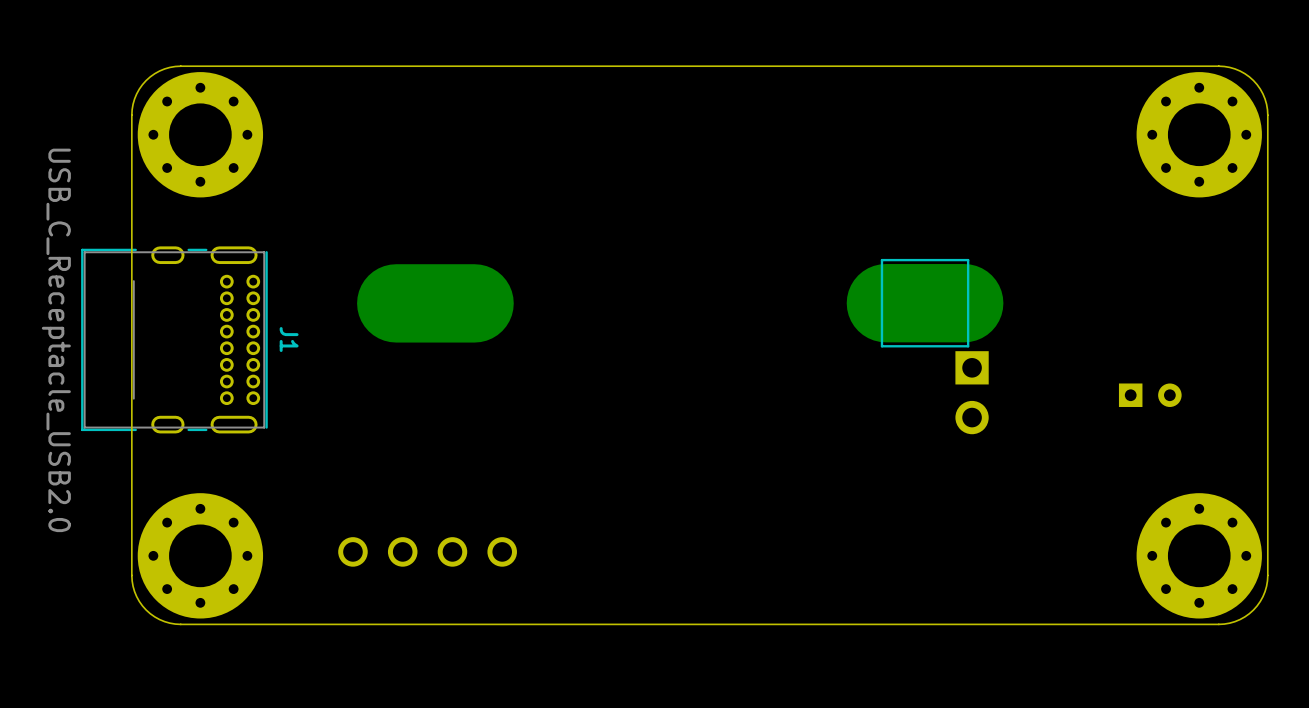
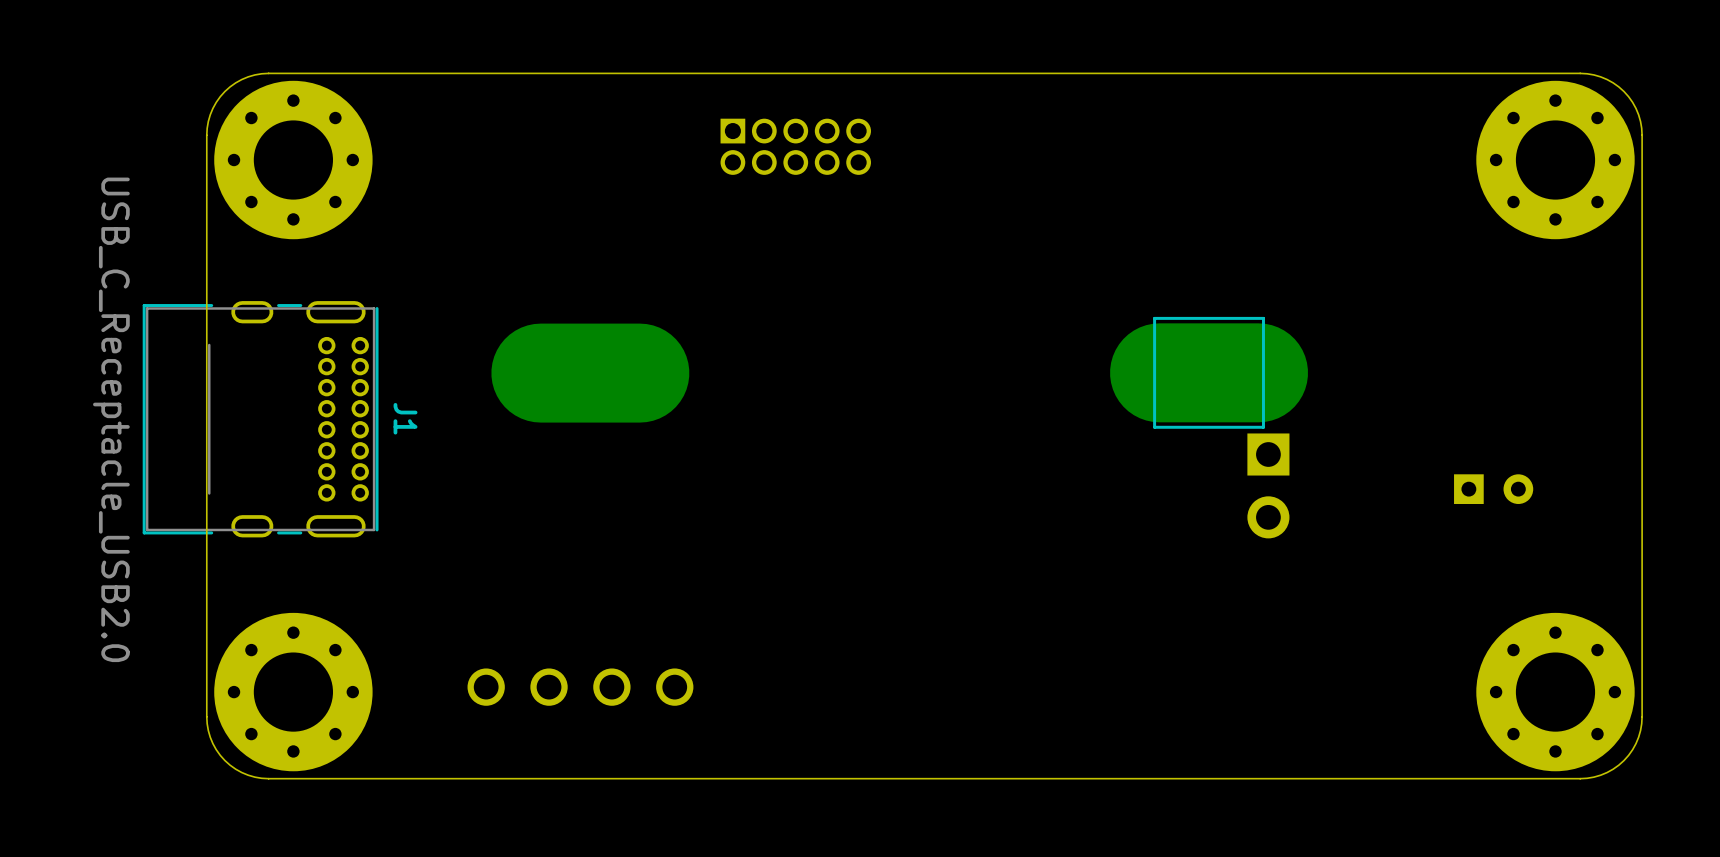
part: none -> (795, 146)

